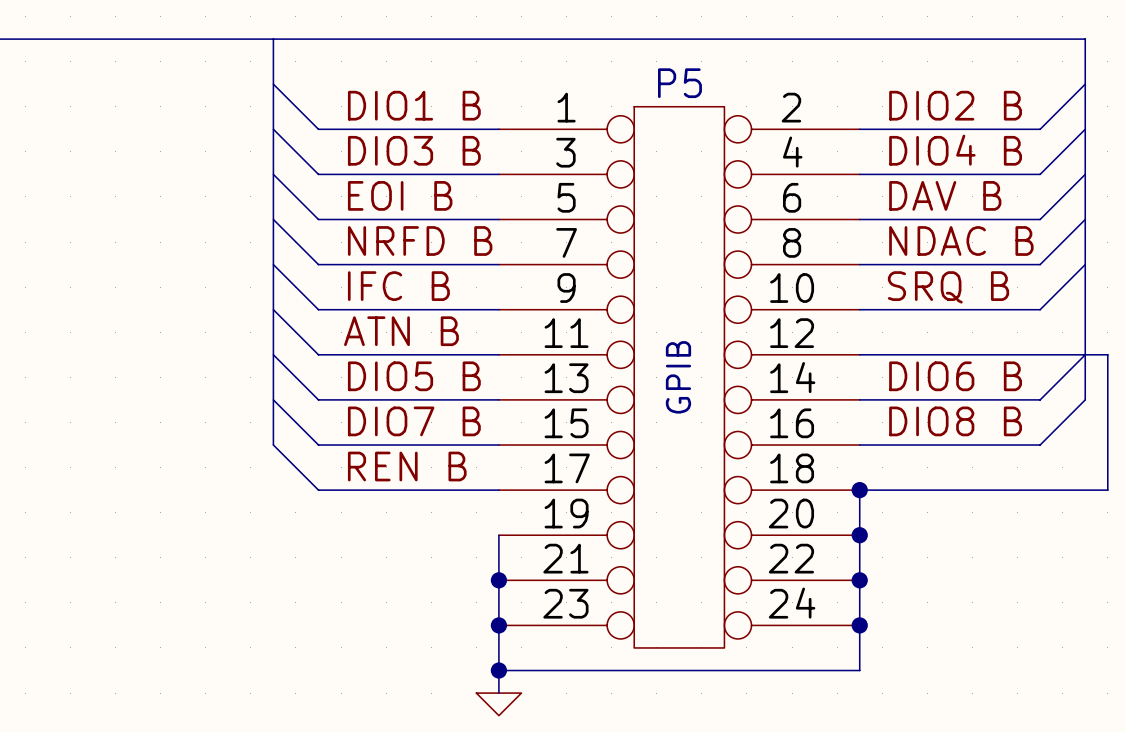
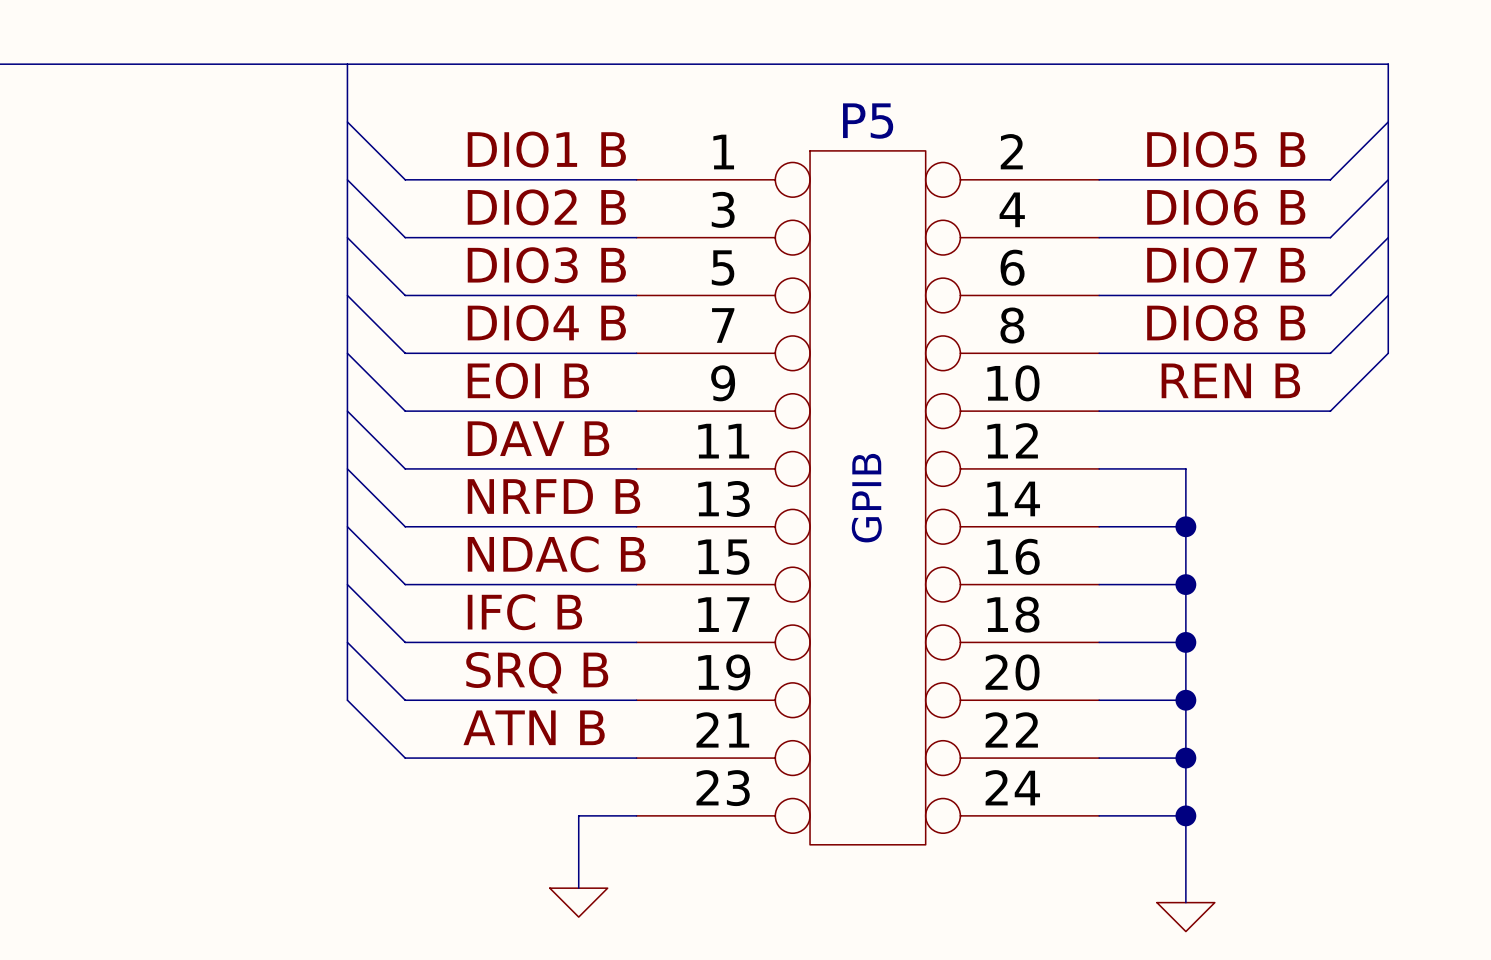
label position: DIO1 B (414, 105) -> DIO1 B (546, 149)
label: DIO2 B (955, 105) -> DIO5 B (1226, 149)
label position: DIO3 B (414, 150) -> DIO3 B (546, 265)
label: none -> DIO2 B (546, 207)
label: DIO4 B (955, 150) -> none
label position: EOI B (400, 195) -> EOI B (528, 380)
label: DAV B (945, 195) -> DIO7 B (1226, 265)
label: none -> DIO4 B (546, 323)
label position: NRFD B (420, 241) -> NRFD B (553, 496)
label: NDAC B (961, 241) -> none
bus: (1085, 264) (1085, 399) -> none
label position: IFC B (398, 286) -> IFC B (524, 612)
label: none -> REN B (1230, 380)
label: SRQ B (948, 287) -> none
label position: ATN B (401, 331) -> ATN B (534, 727)
label: none -> DAV B (538, 438)
wire: (927, 354) (1107, 354) (1107, 490) (927, 490) -> (1185, 468) (1185, 902)
wire: (1085, 354) (1040, 399) (927, 399) -> none
label: DIO5 B (414, 376) -> none
label position: DIO6 B (955, 376) -> DIO6 B (1226, 207)
junction: none -> (1185, 526)
wire: (1085, 399) (1040, 445) (927, 445) -> none
label: DIO7 B (414, 421) -> none
label: none -> NDAC B (556, 554)
label position: DIO8 B (955, 421) -> DIO8 B (1226, 323)
bus: none -> (347, 584) (347, 700)
junction: none -> (1185, 584)
label: REN B (407, 466) -> none
wire: (859, 490) (859, 670) (498, 670) -> none
junction: (859, 490) -> none
junction: none -> (1185, 642)
label: none -> SRQ B (537, 672)
wire: none -> (347, 700) (405, 758) (636, 758)
wire: (498, 535) (498, 693) -> (636, 700) (405, 700) (347, 642)
wire: none -> (1099, 700) (1185, 700)
junction: (859, 535) -> none
junction: none -> (1185, 700)
junction: (498, 580) -> none
wire: none -> (1099, 758) (1185, 758)
junction: (859, 580) -> none
junction: none -> (1185, 758)
wire: none -> (636, 815) (578, 815) (578, 888)
junction: (498, 625) -> none
wire: none -> (1099, 815) (1185, 815)
junction: (859, 625) -> none
junction: none -> (1185, 815)
junction: (498, 670) -> none
power symbol position: (498, 704) -> (578, 902)
power symbol: none -> (1185, 917)

